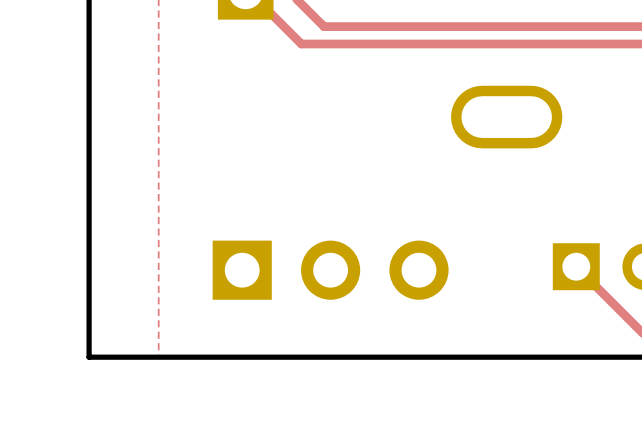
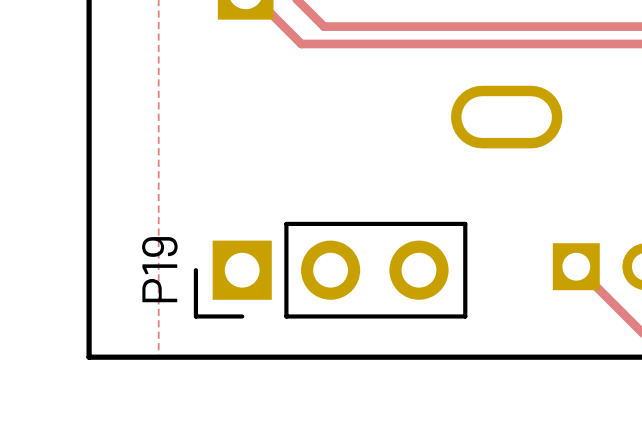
P19 side: bottom (330, 270) -> top (330, 270)

